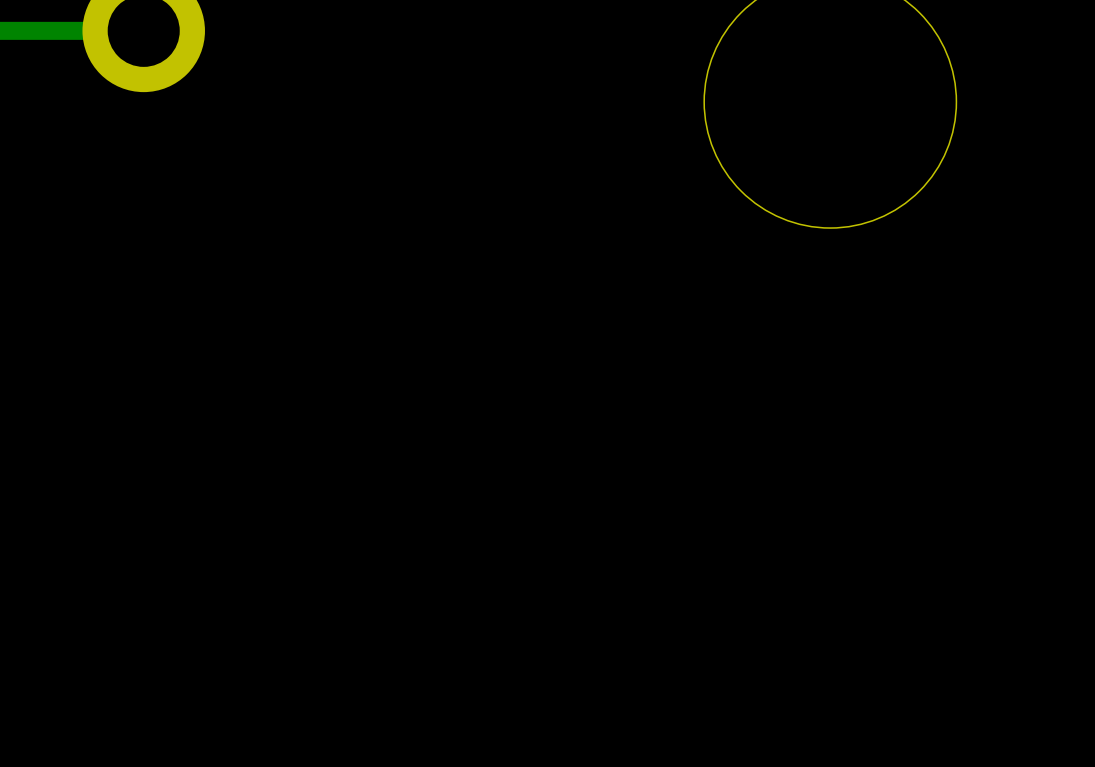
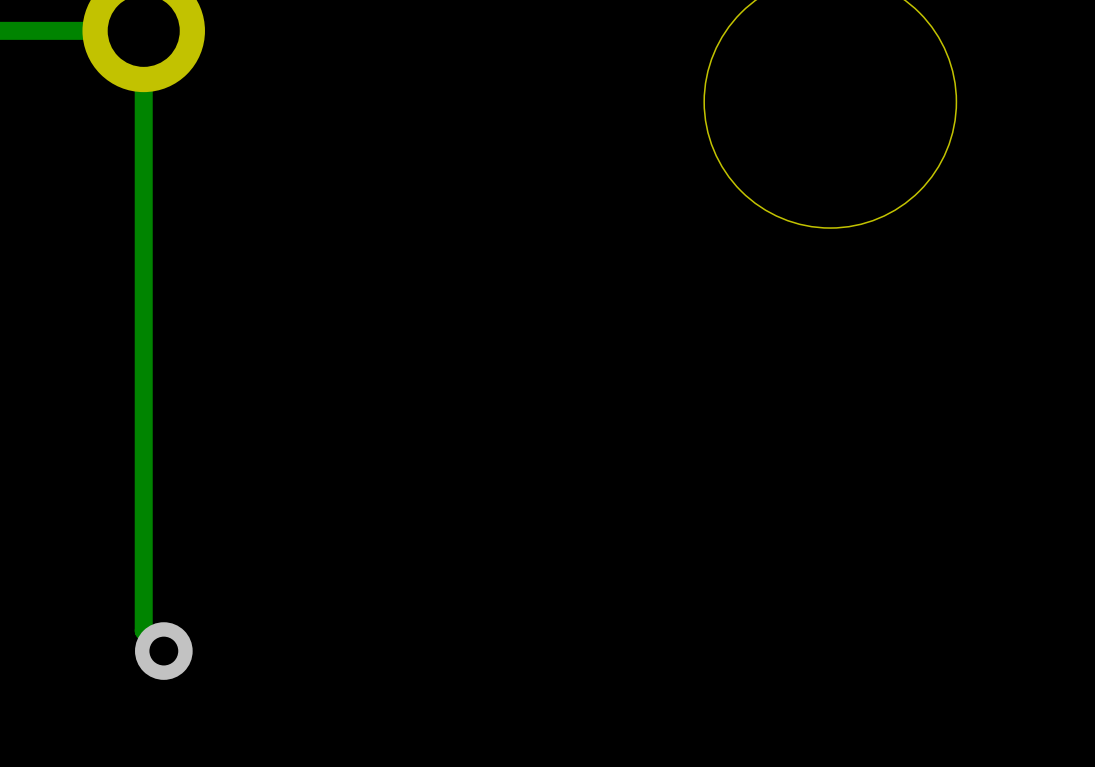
track: none -> (143, 30) (143, 630) (163, 651)
via: none -> (163, 651)

